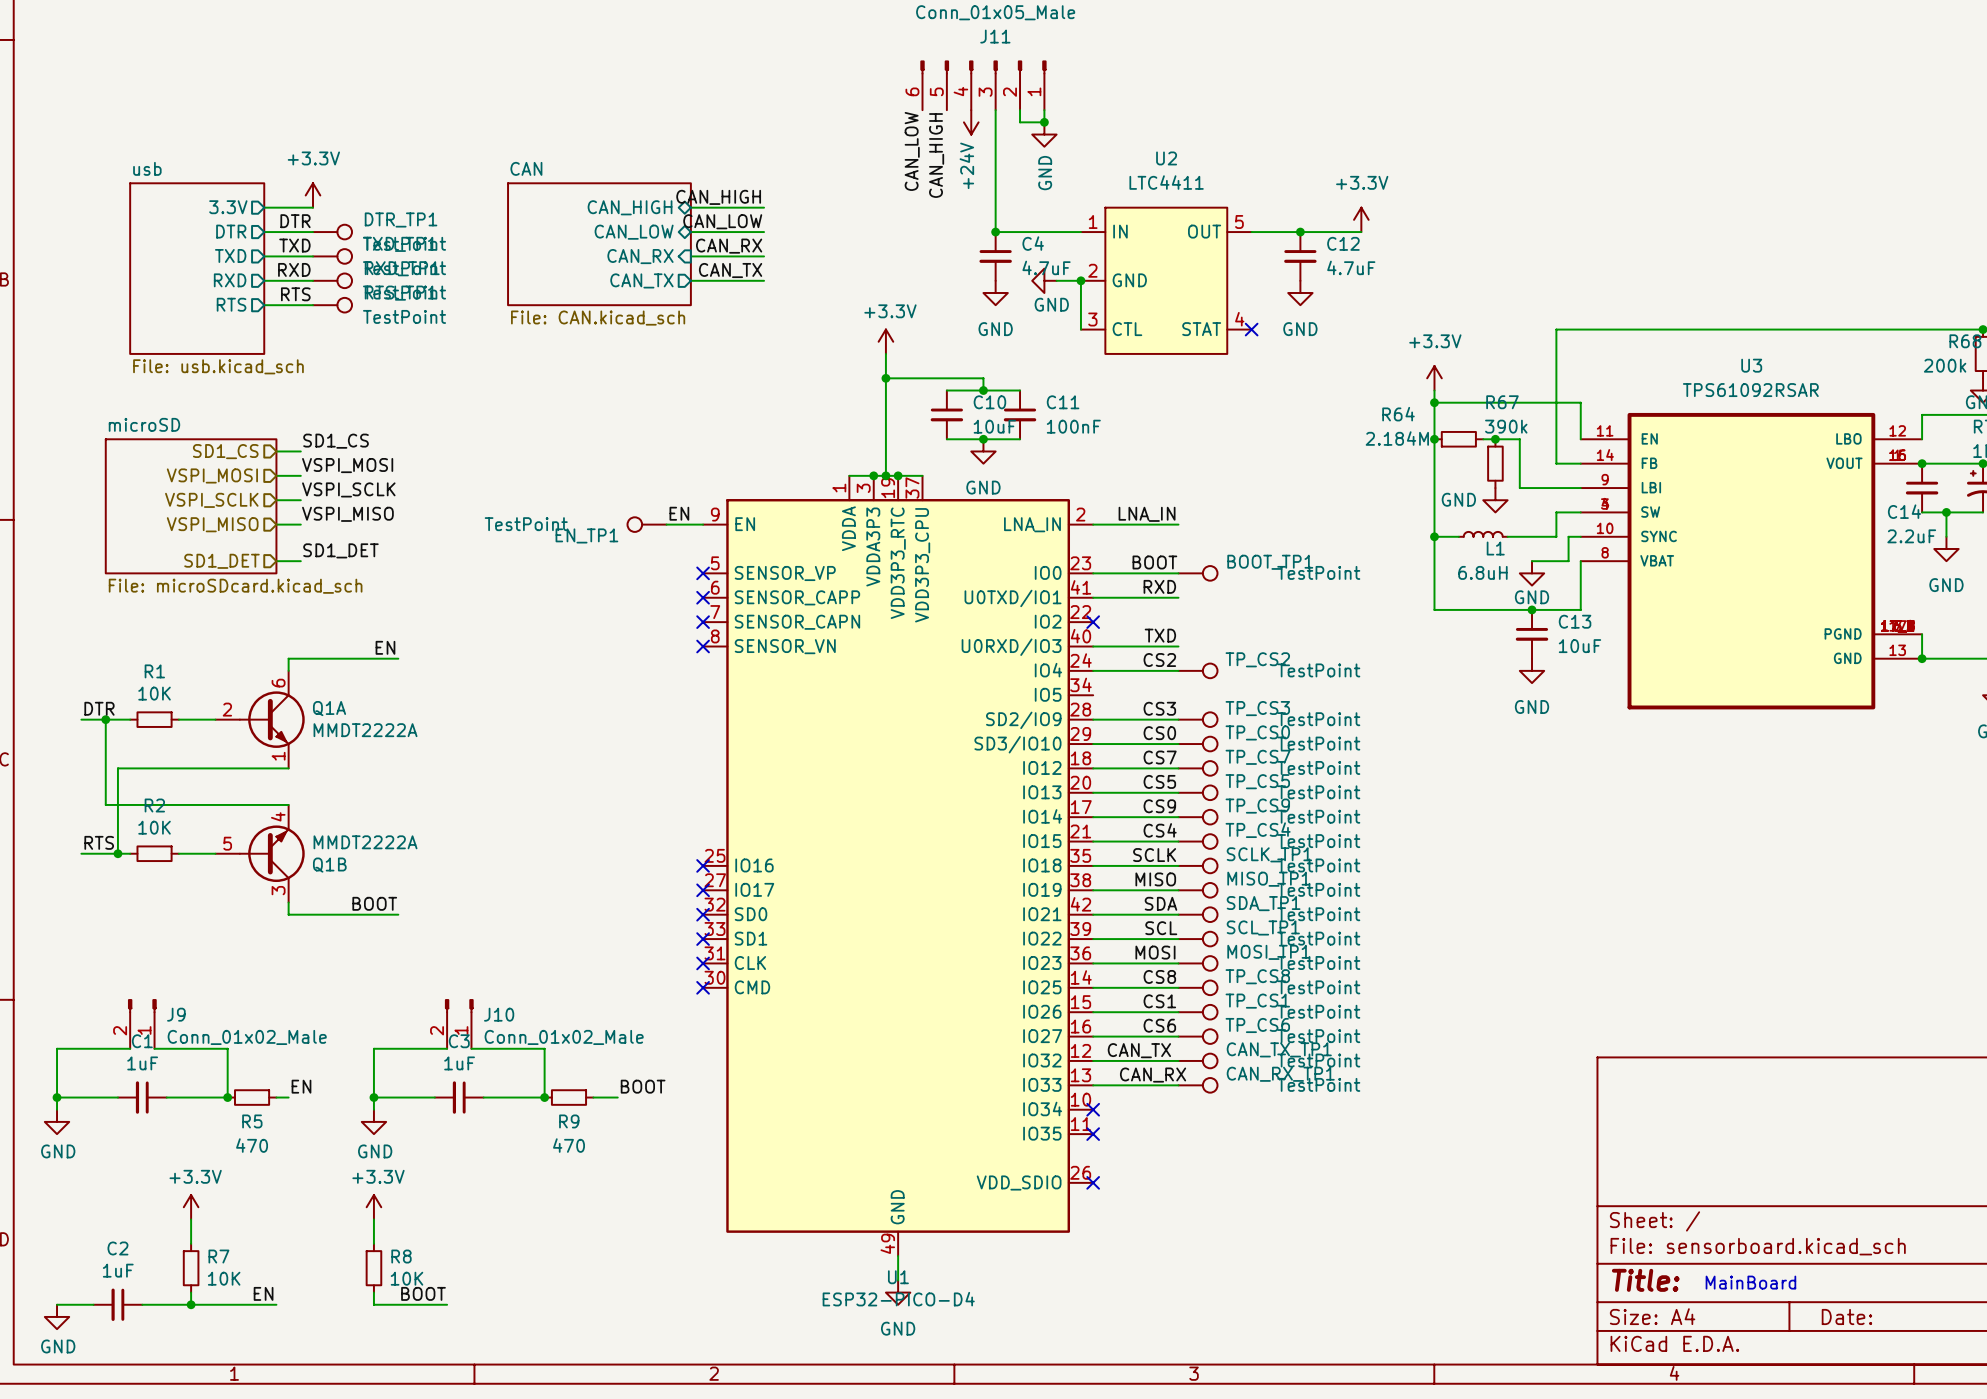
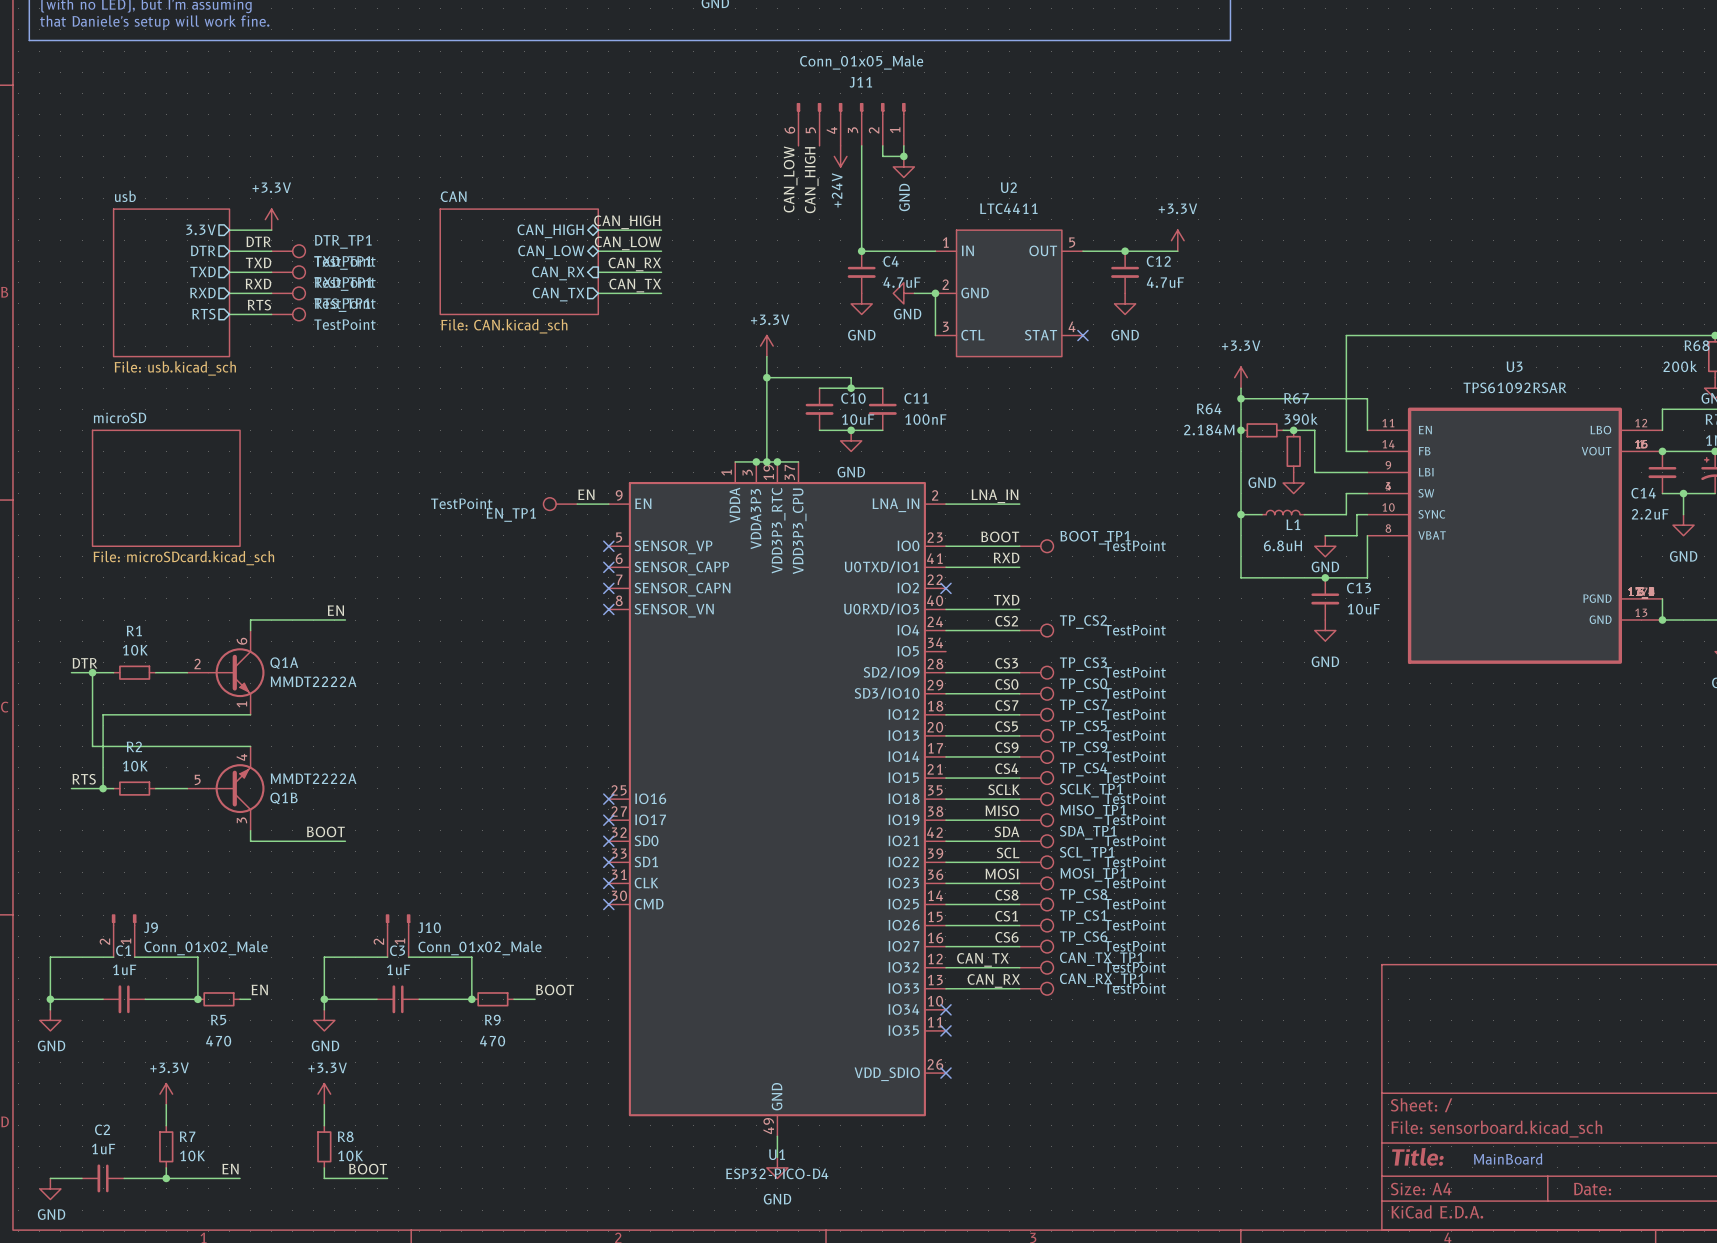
label: SD1_CS (336, 441) -> none
hierarchical label: SD1_CS (225, 451) -> none
wire: (276, 451) (300, 451) -> none
label: VSPI_MOSI (347, 465) -> none
hierarchical label: VSPI_MOSI (212, 475) -> none
wire: (276, 475) (300, 475) -> none
label: VSPI_SCLK (348, 489) -> none
hierarchical label: VSPI_SCLK (211, 500) -> none
wire: (276, 500) (300, 500) -> none
label: VSPI_MISO (347, 514) -> none
hierarchical label: VSPI_MISO (212, 524) -> none
wire: (276, 524) (300, 524) -> none
label: SD1_DET (340, 550) -> none
hierarchical label: SD1_DET (221, 561) -> none
wire: (276, 561) (300, 561) -> none

